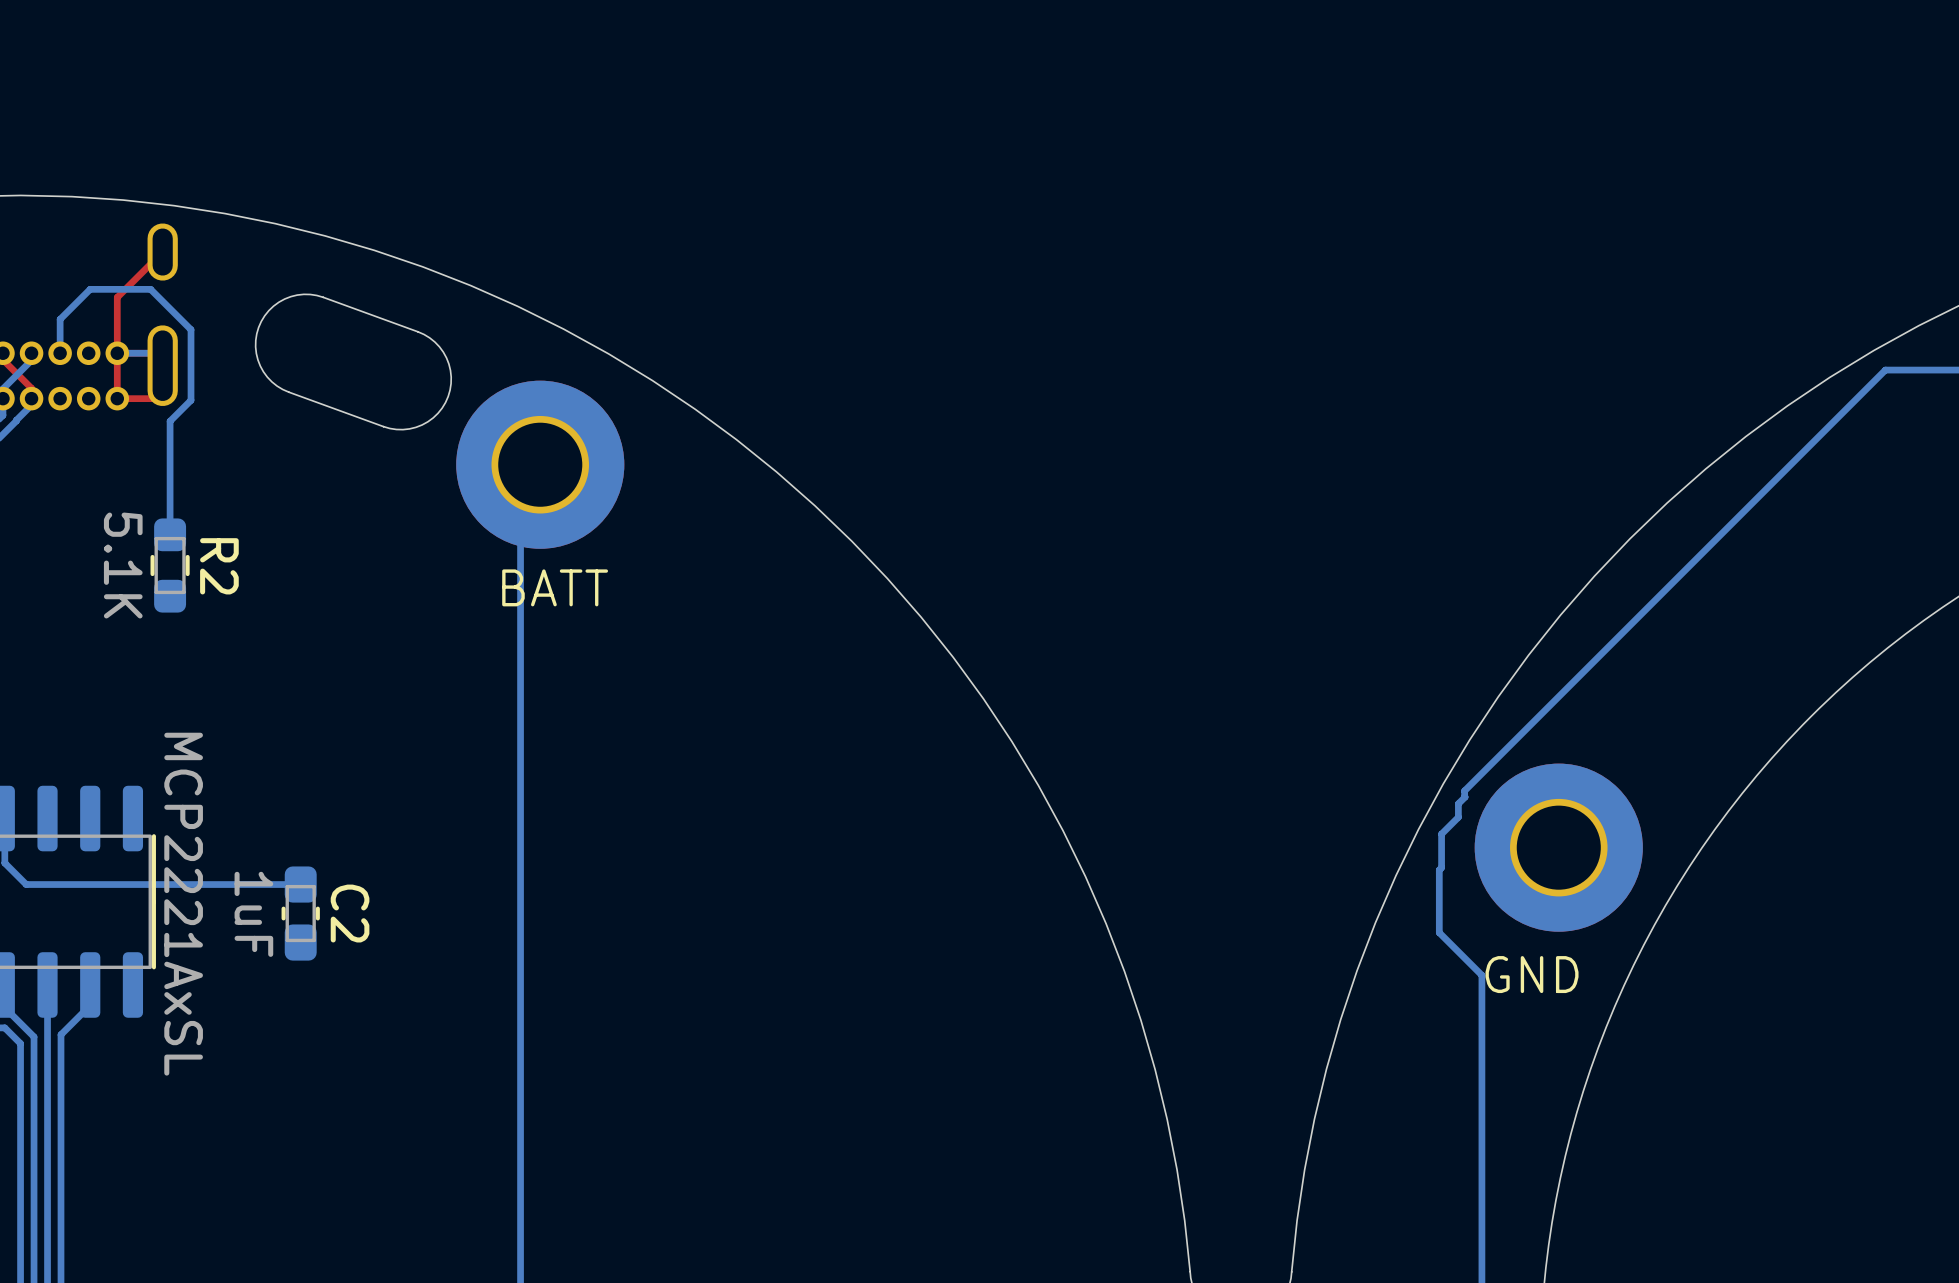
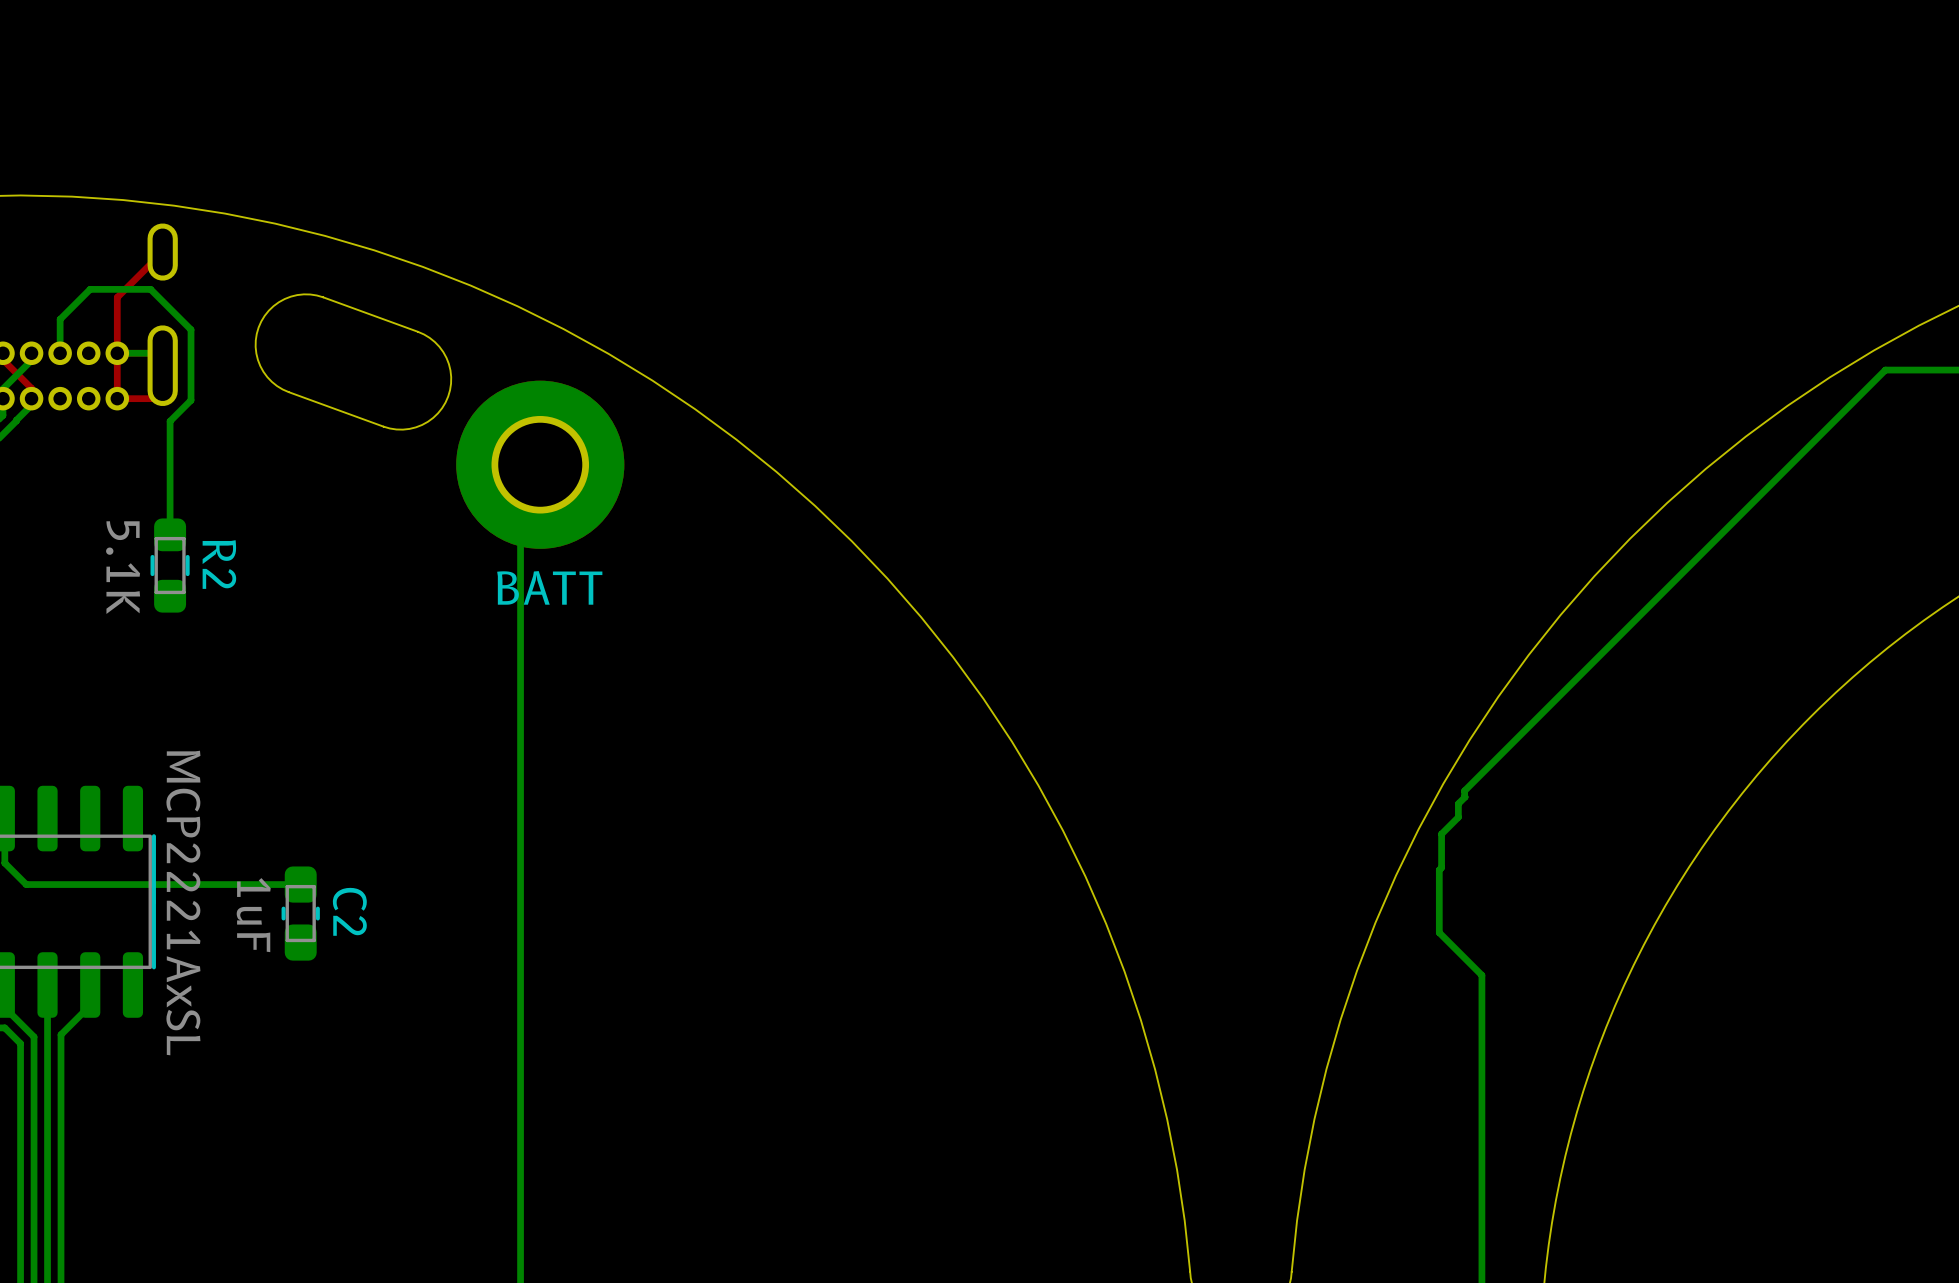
part: (1558, 847) -> none
text: GND (1532, 974) -> none

